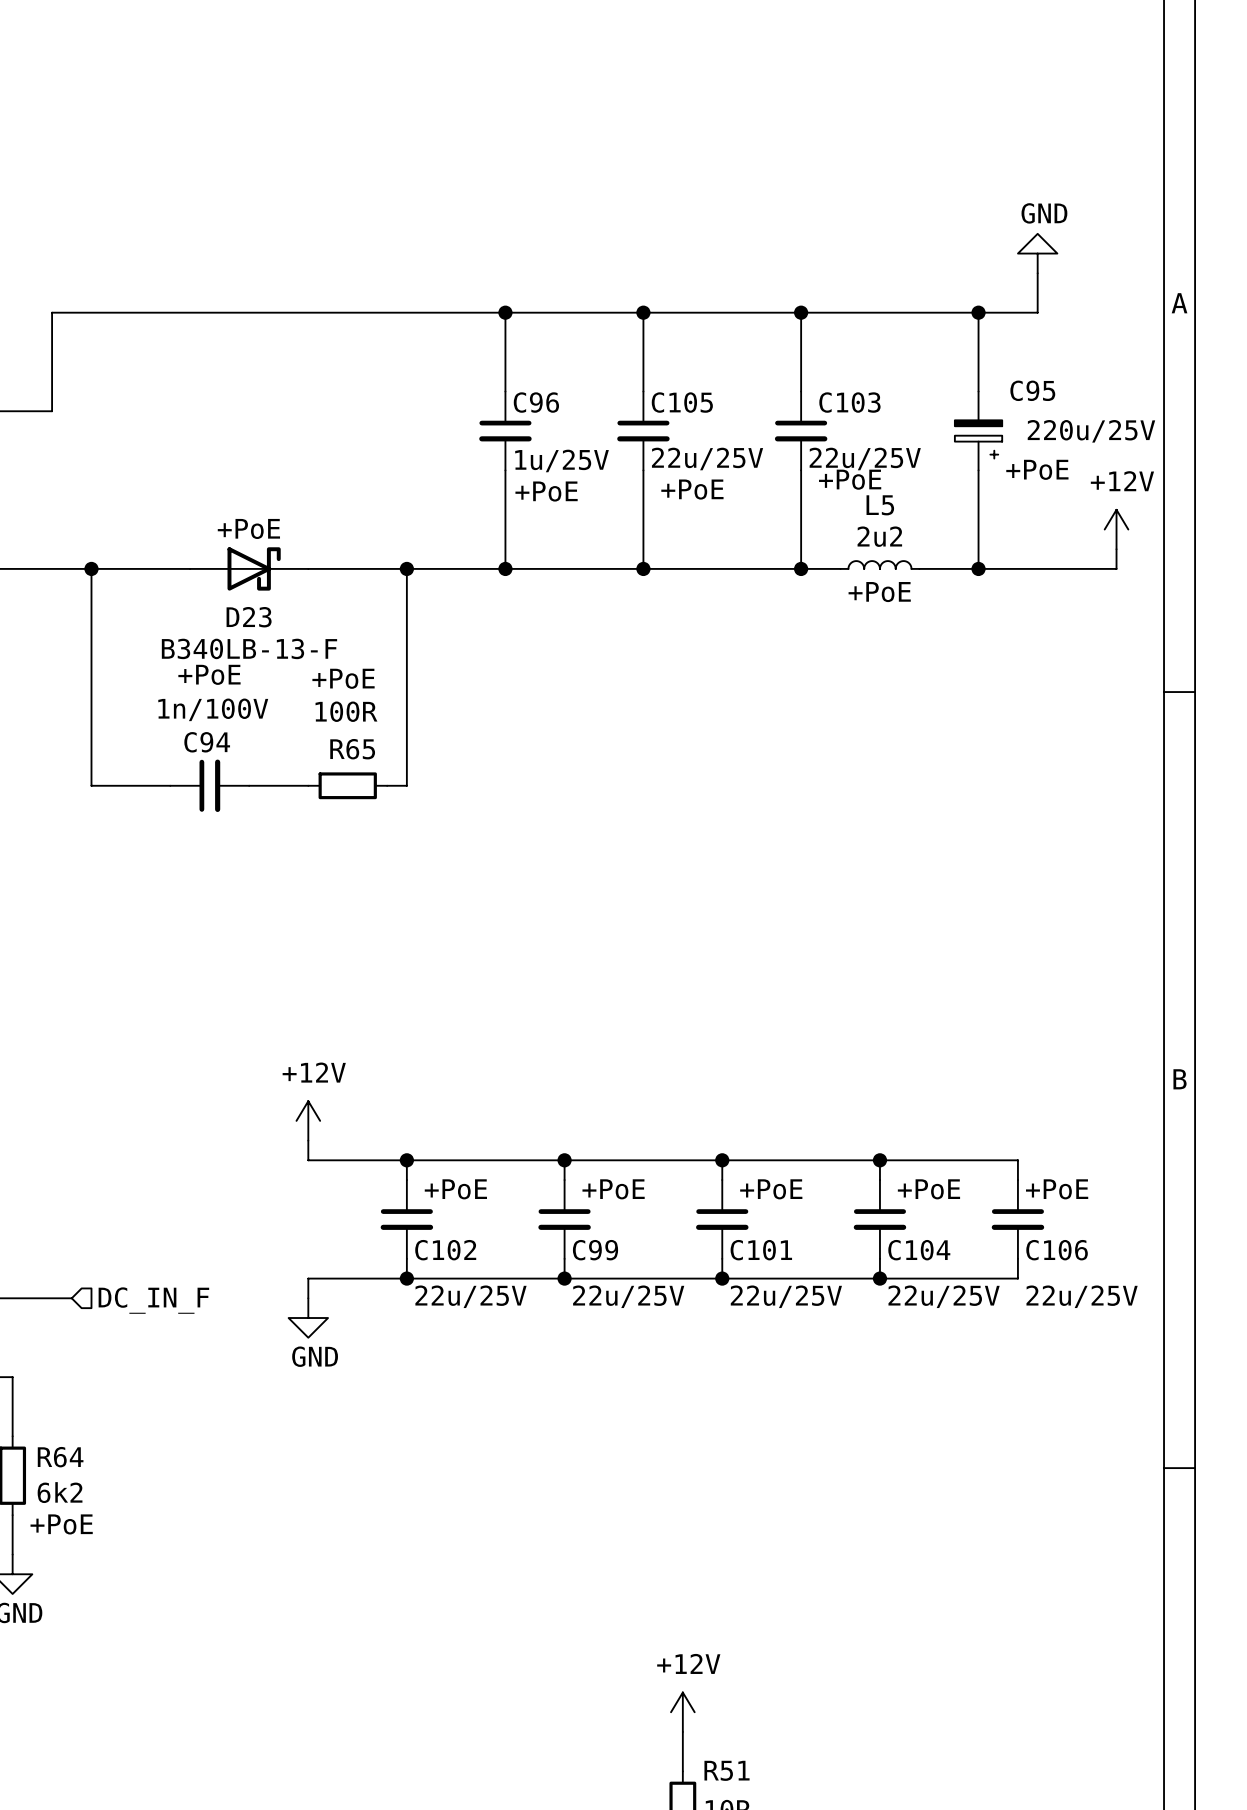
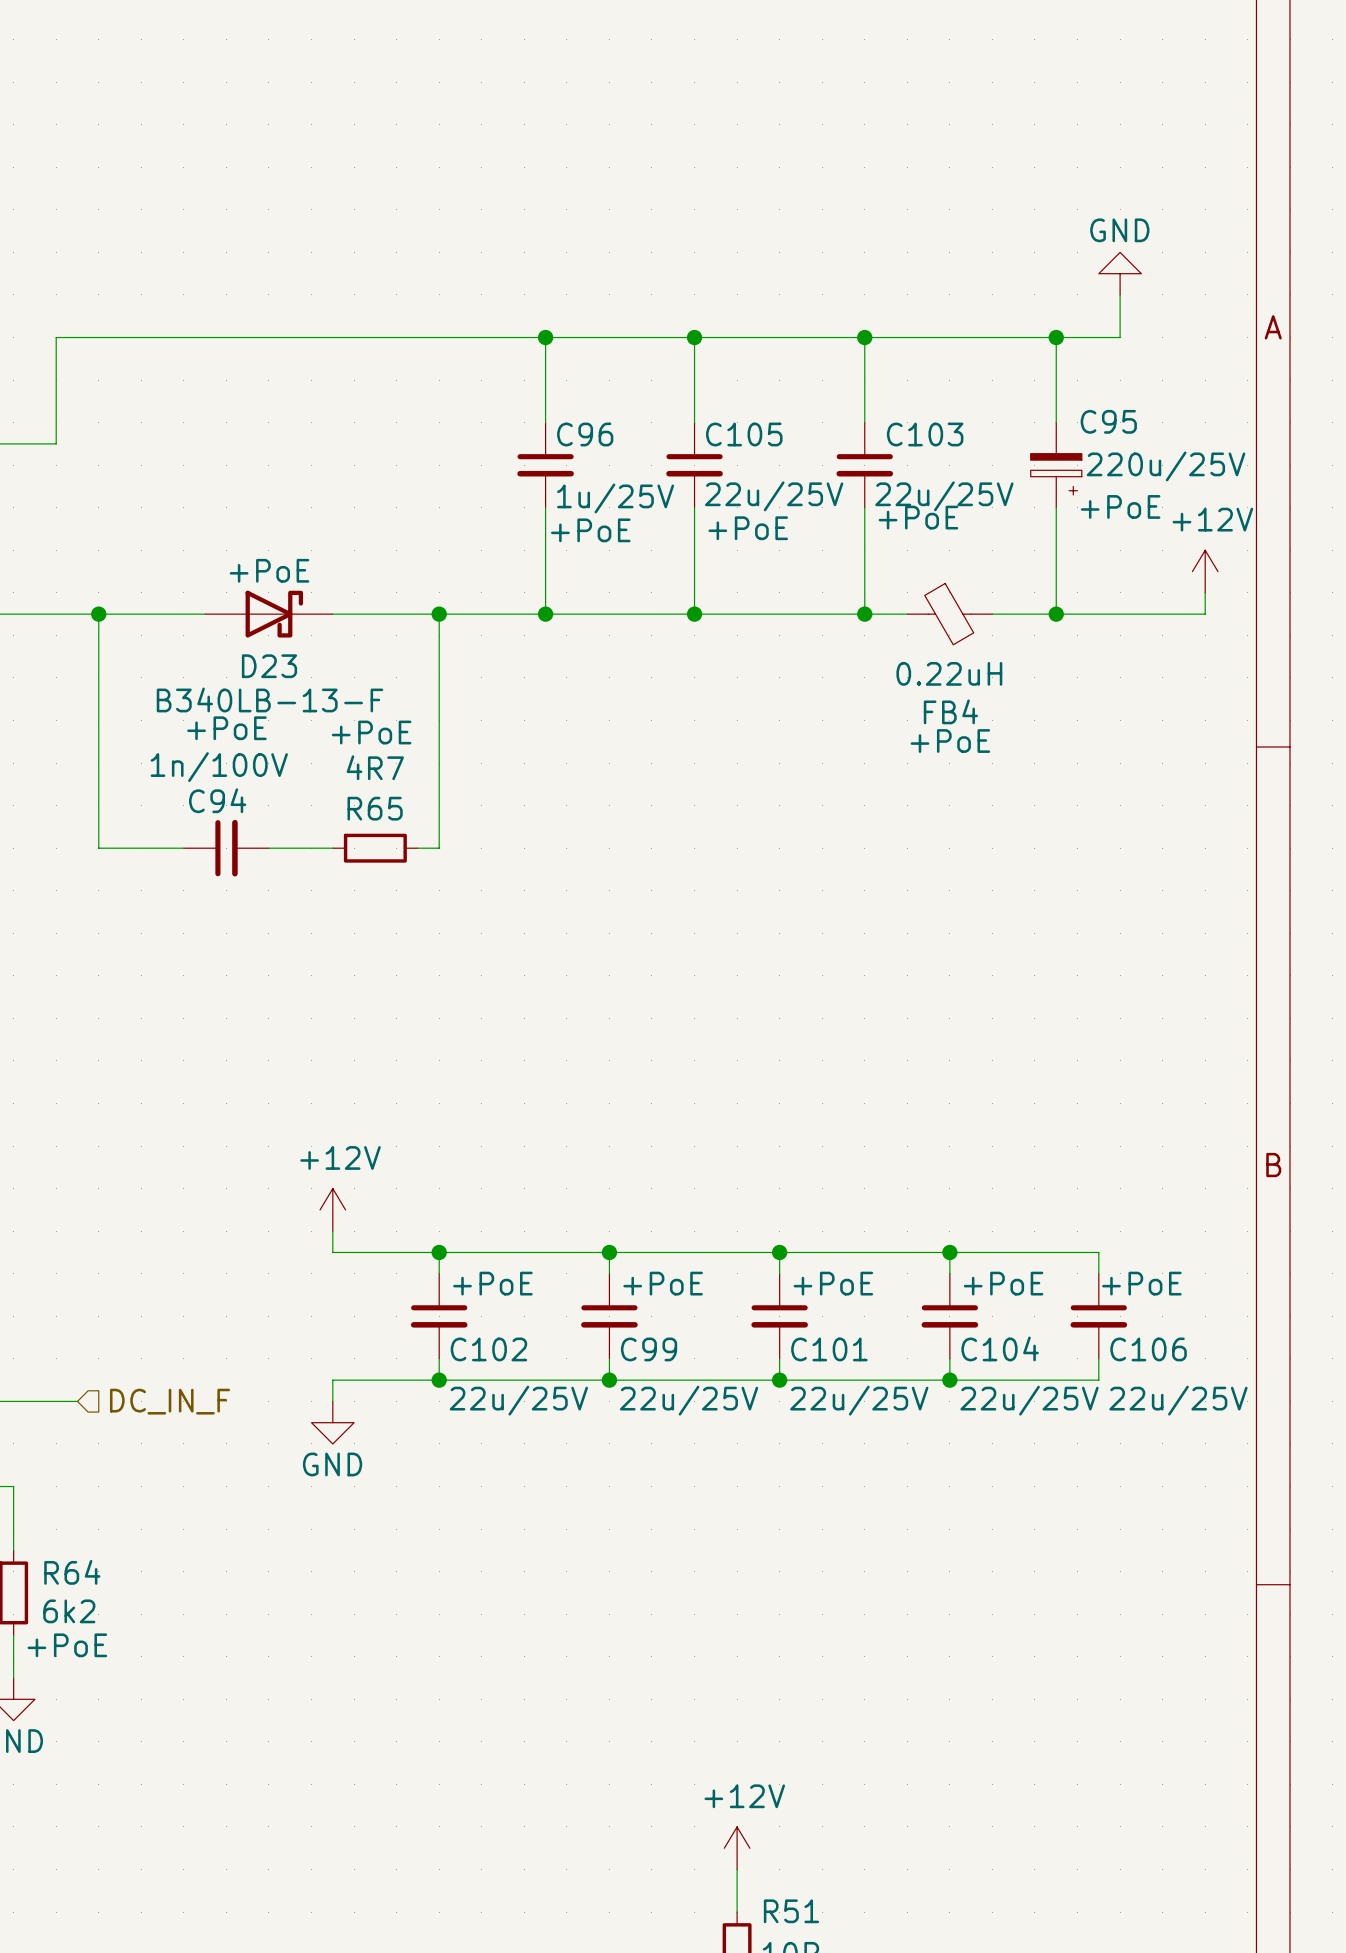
L5: 2u2 (879, 565) -> none
FB4: none -> 0.22uH (949, 614)
R65 value: 100R (346, 711) -> 4R7 (375, 767)

